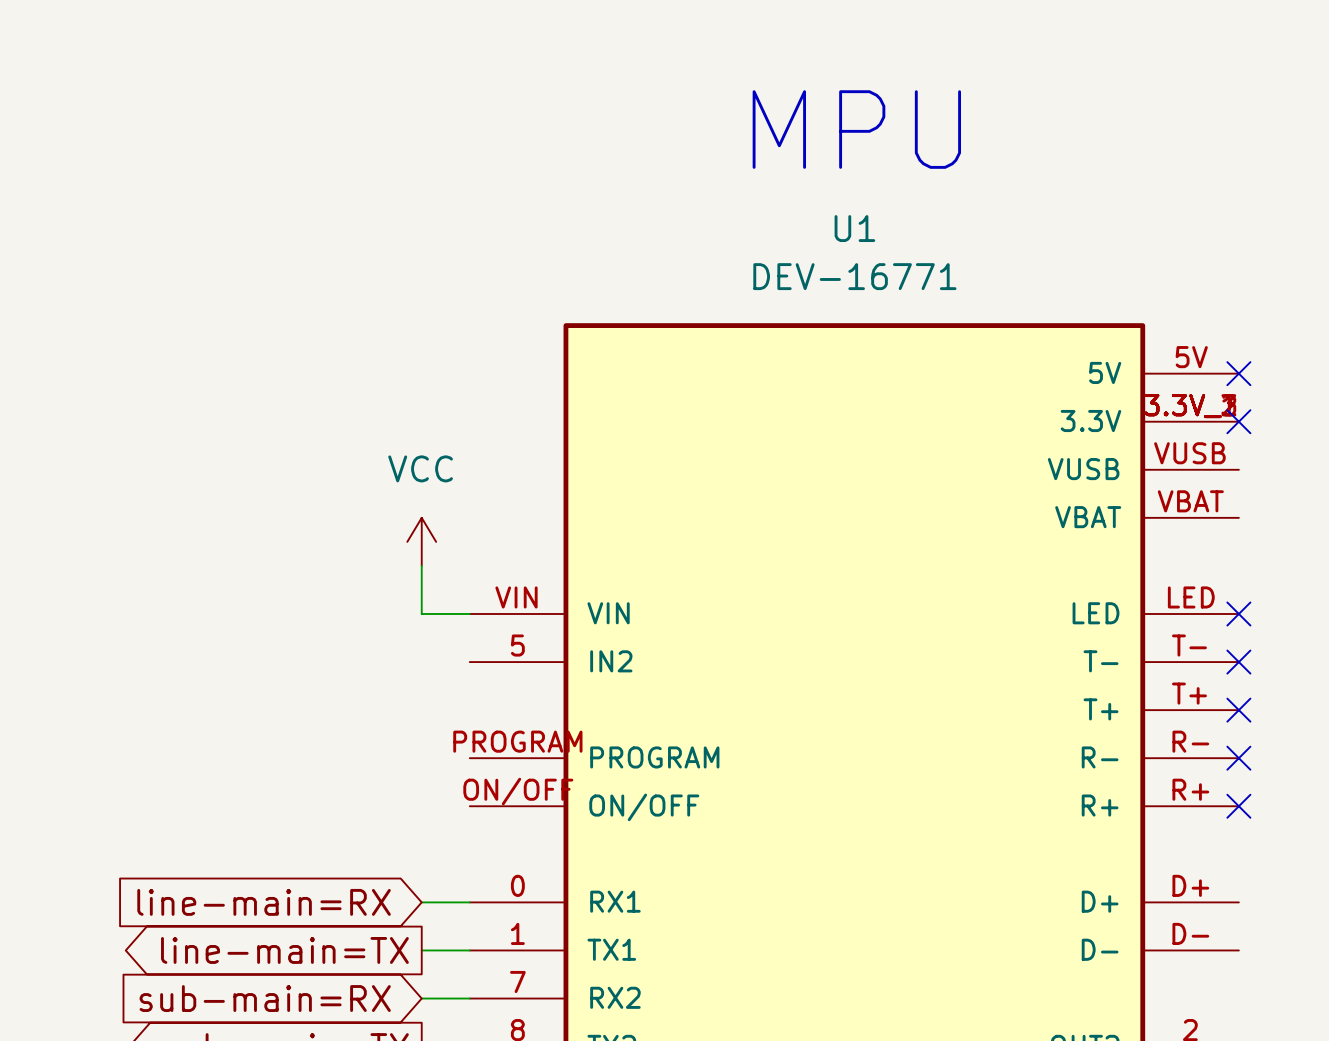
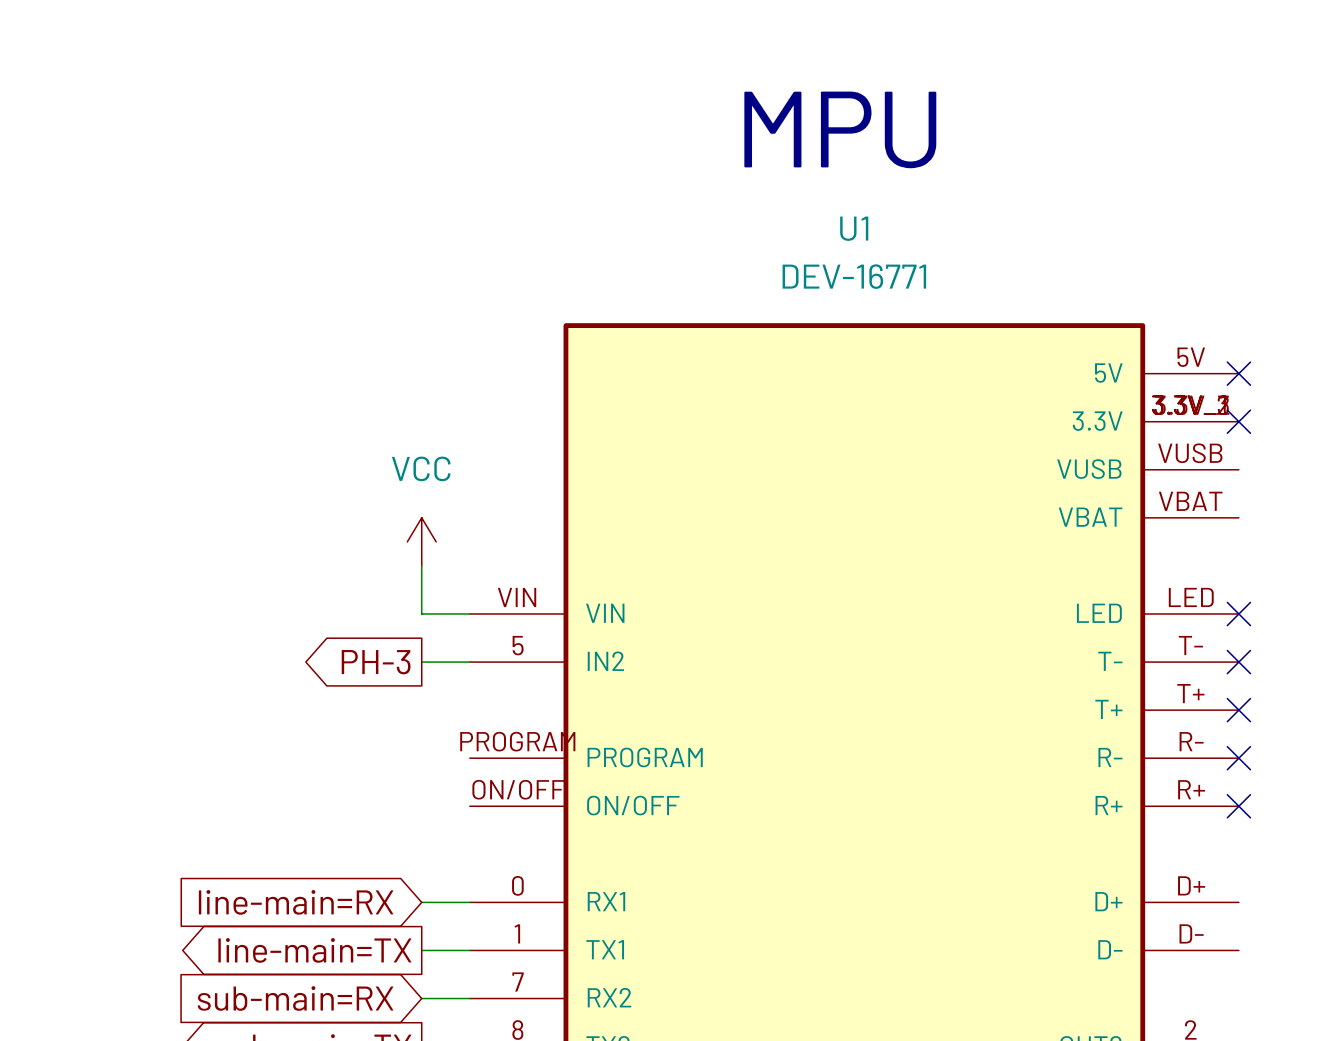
global label: none -> PH-3 (376, 662)
wire: none -> (421, 662) (469, 662)

